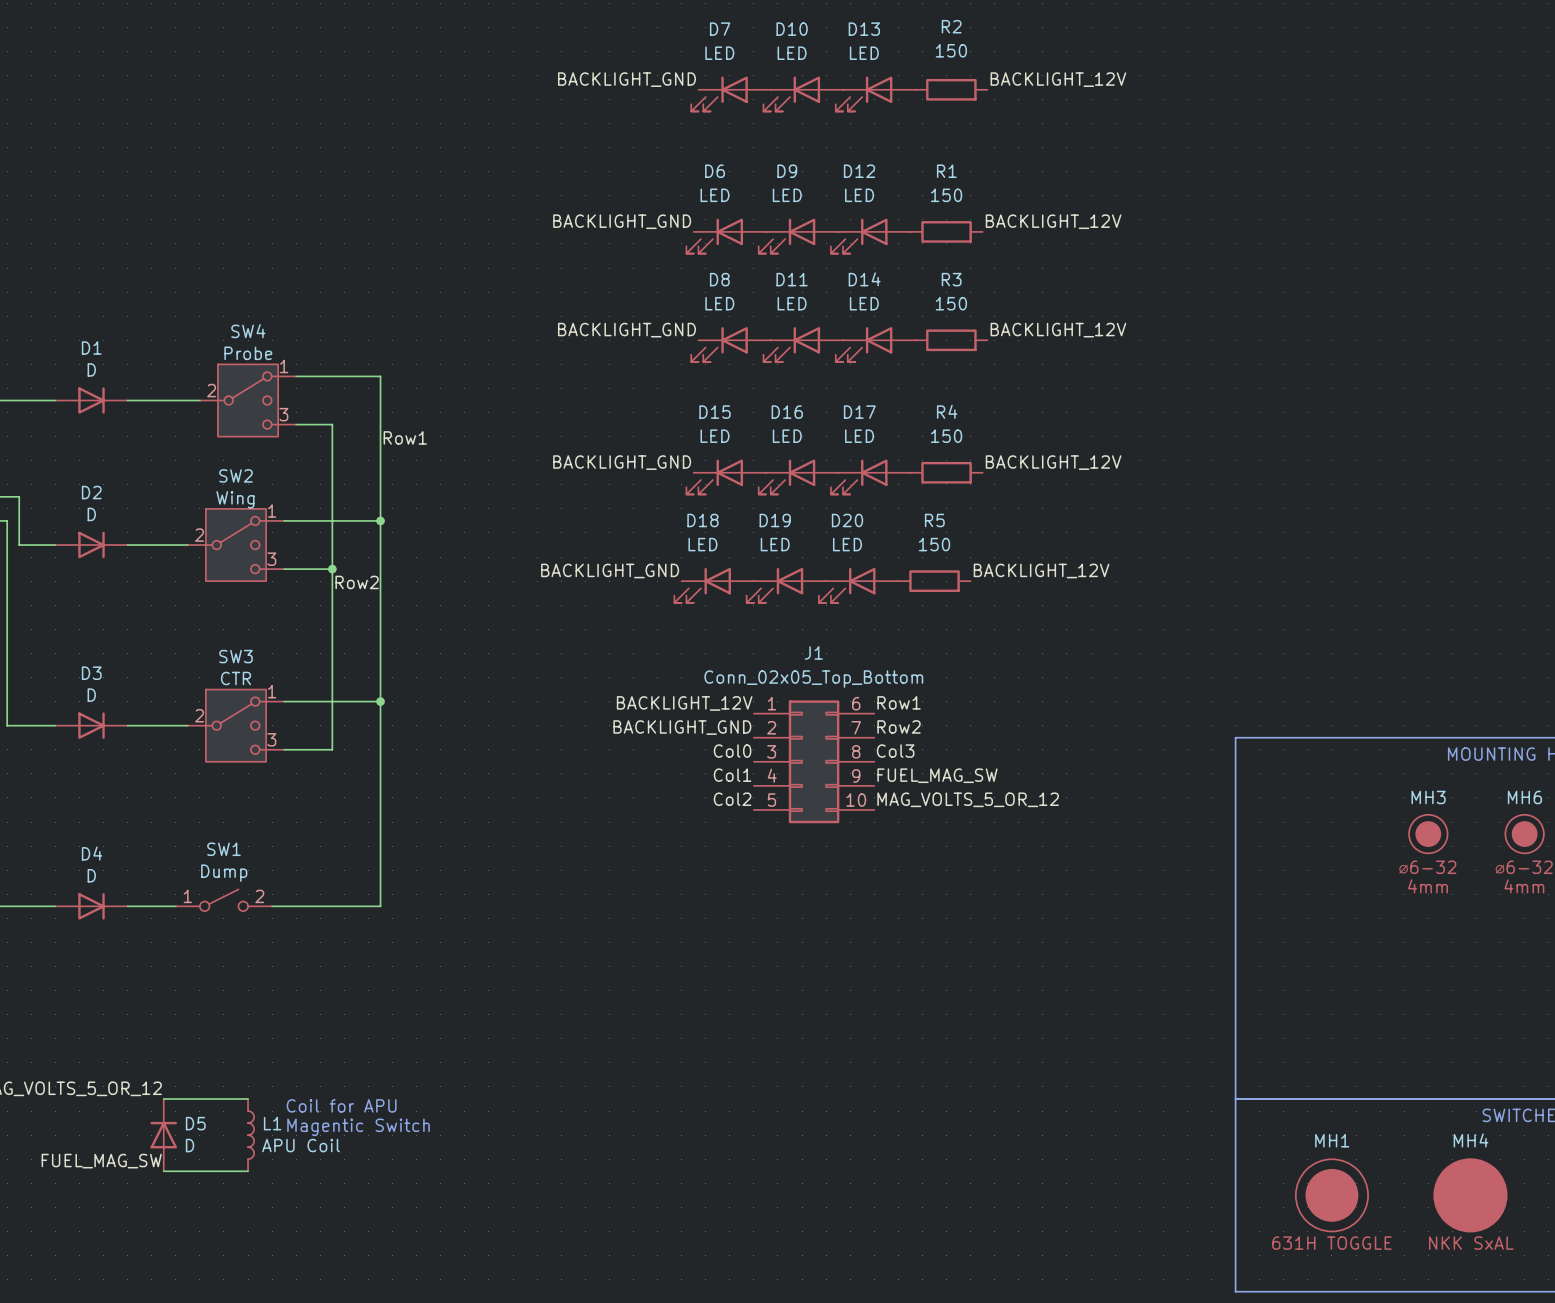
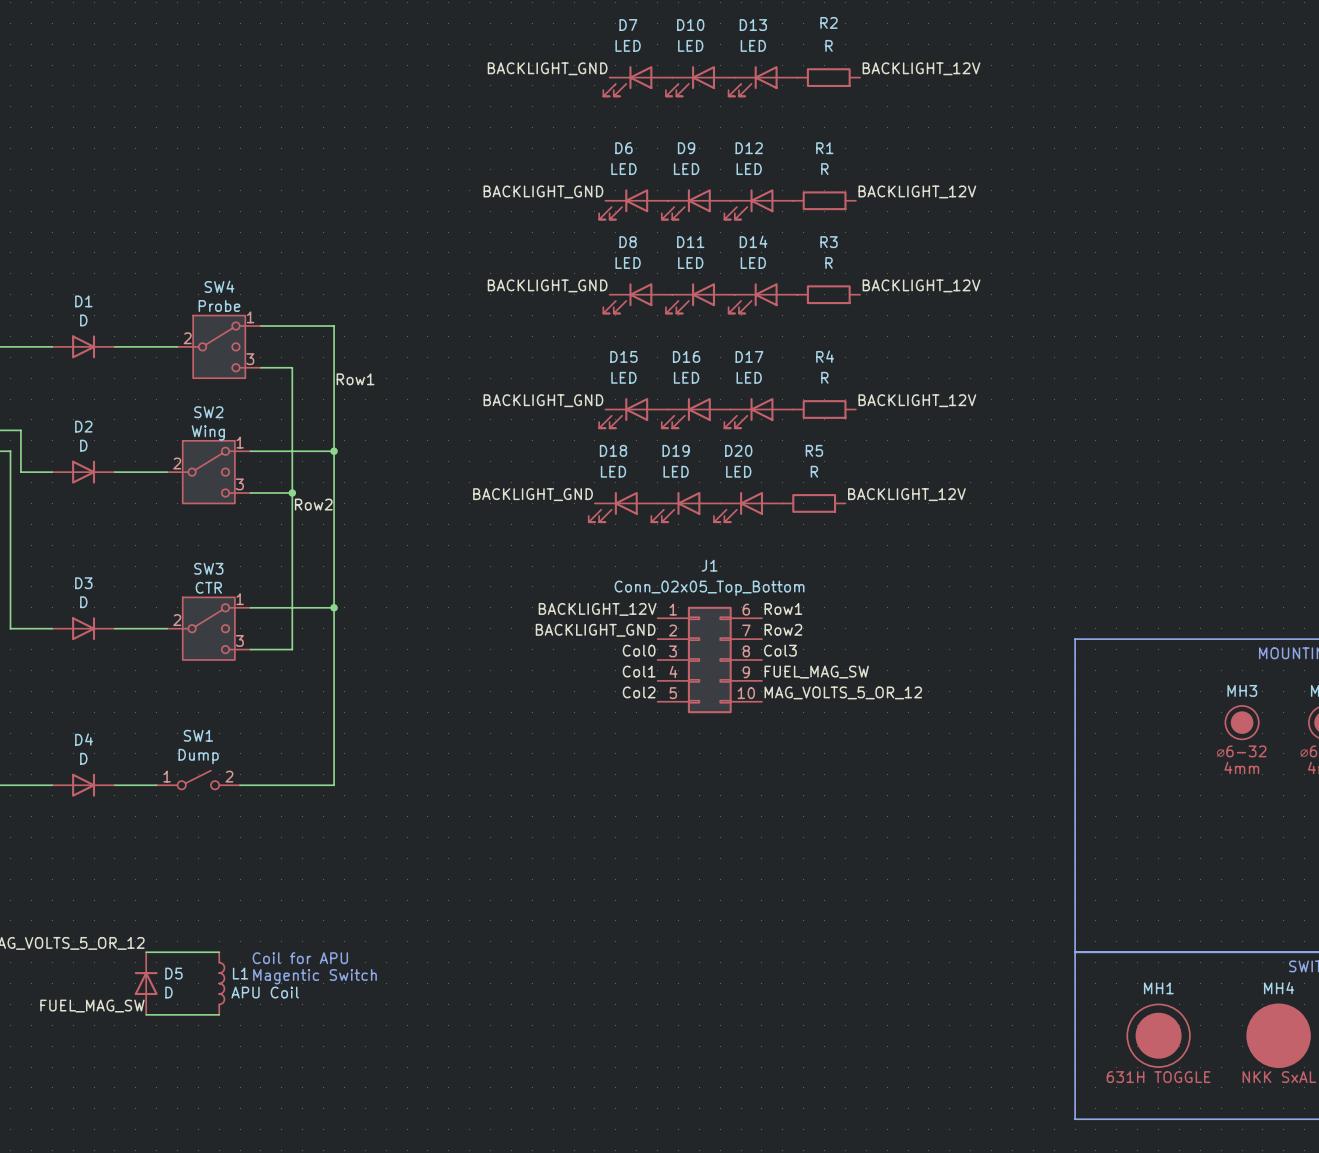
R2 value: 150 (951, 50) -> R (829, 45)
R1 value: 150 (946, 195) -> R (824, 169)
R3 value: 150 (951, 303) -> R (829, 263)
R4 value: 150 (946, 436) -> R (824, 377)
R5 value: 150 (934, 544) -> R (814, 471)

